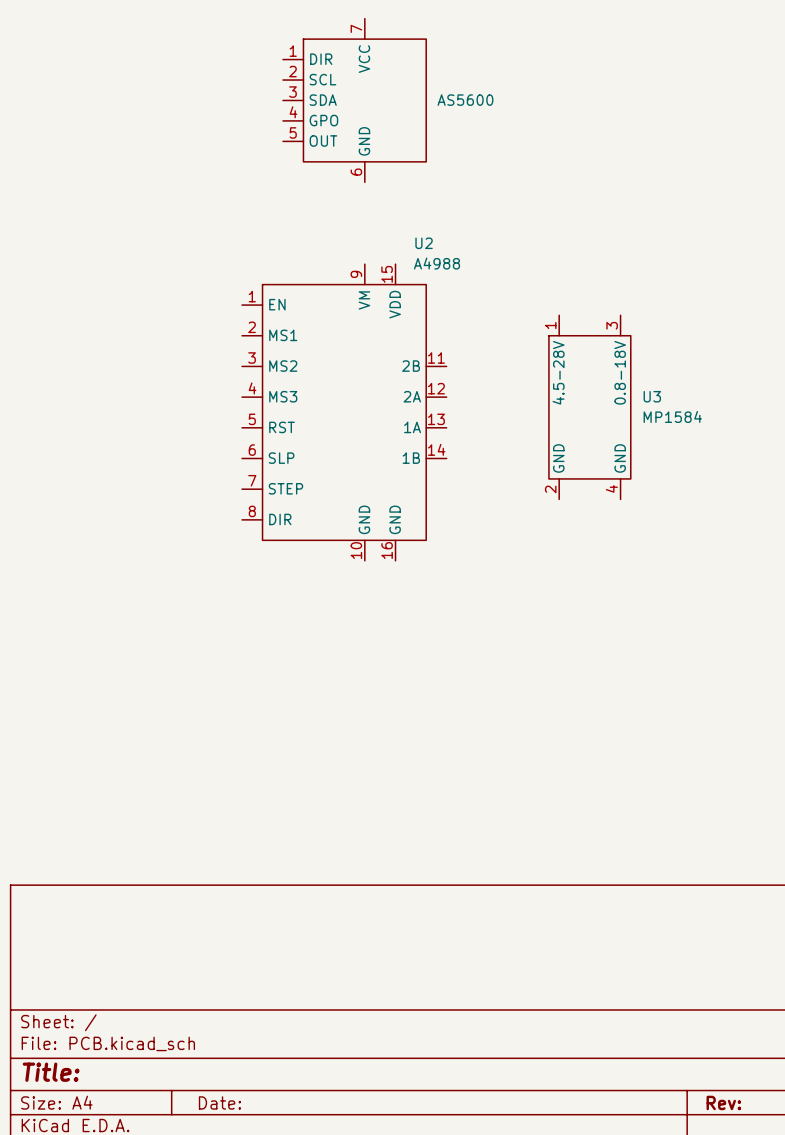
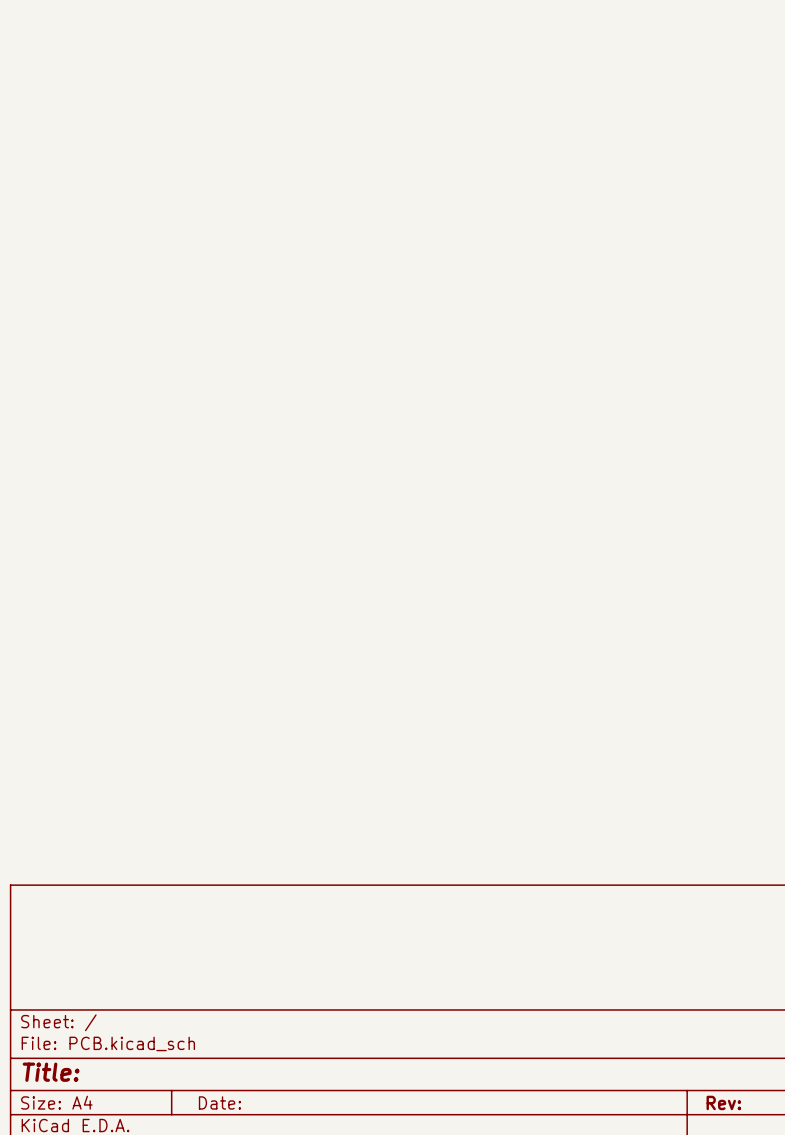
part: AS5600 (354, 100) -> none
U3: MP1584 (589, 407) -> none
U2: A4988 (344, 412) -> none

